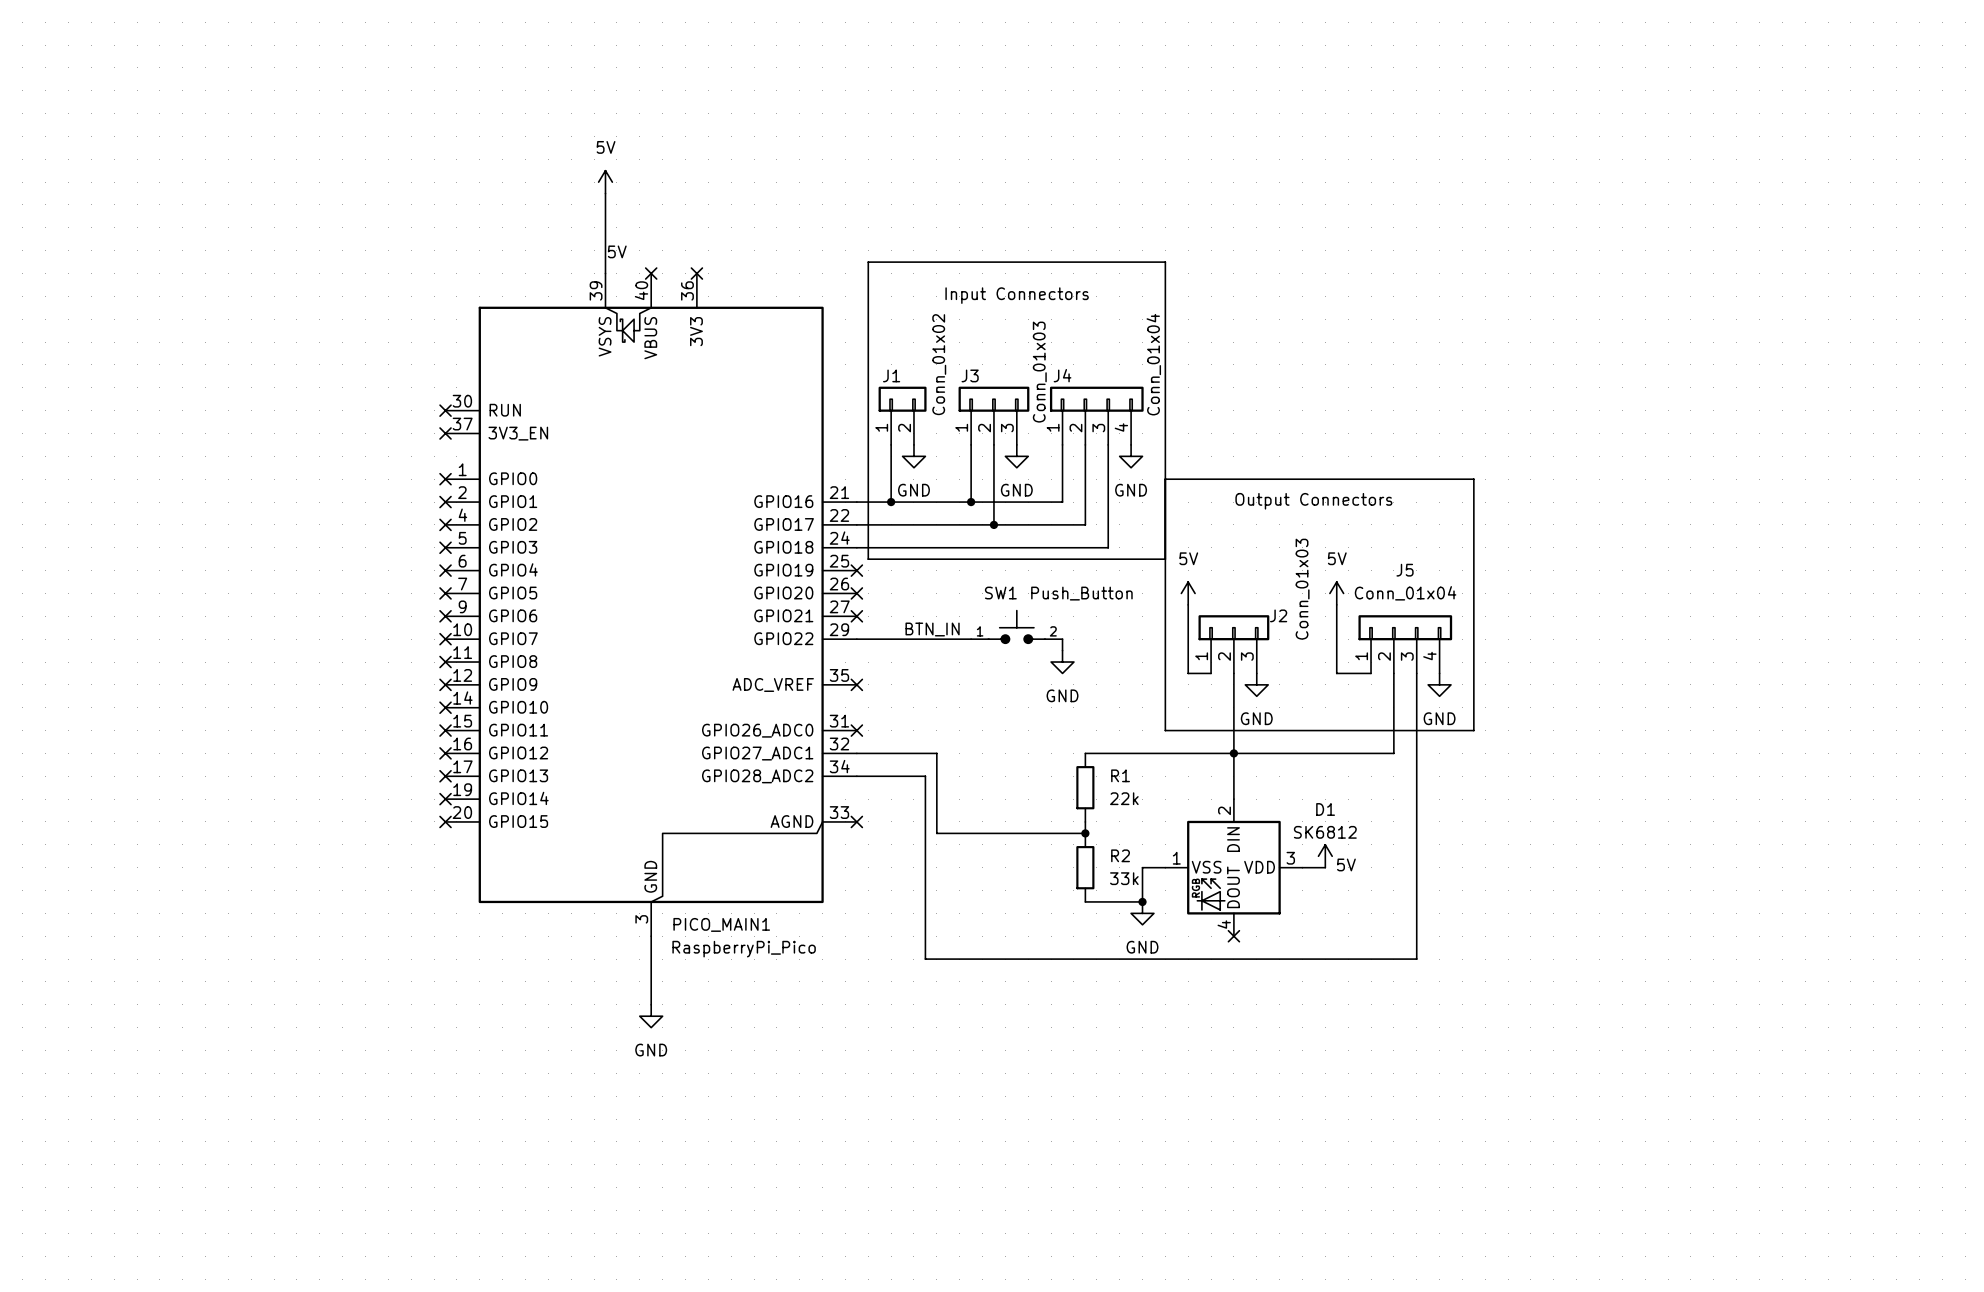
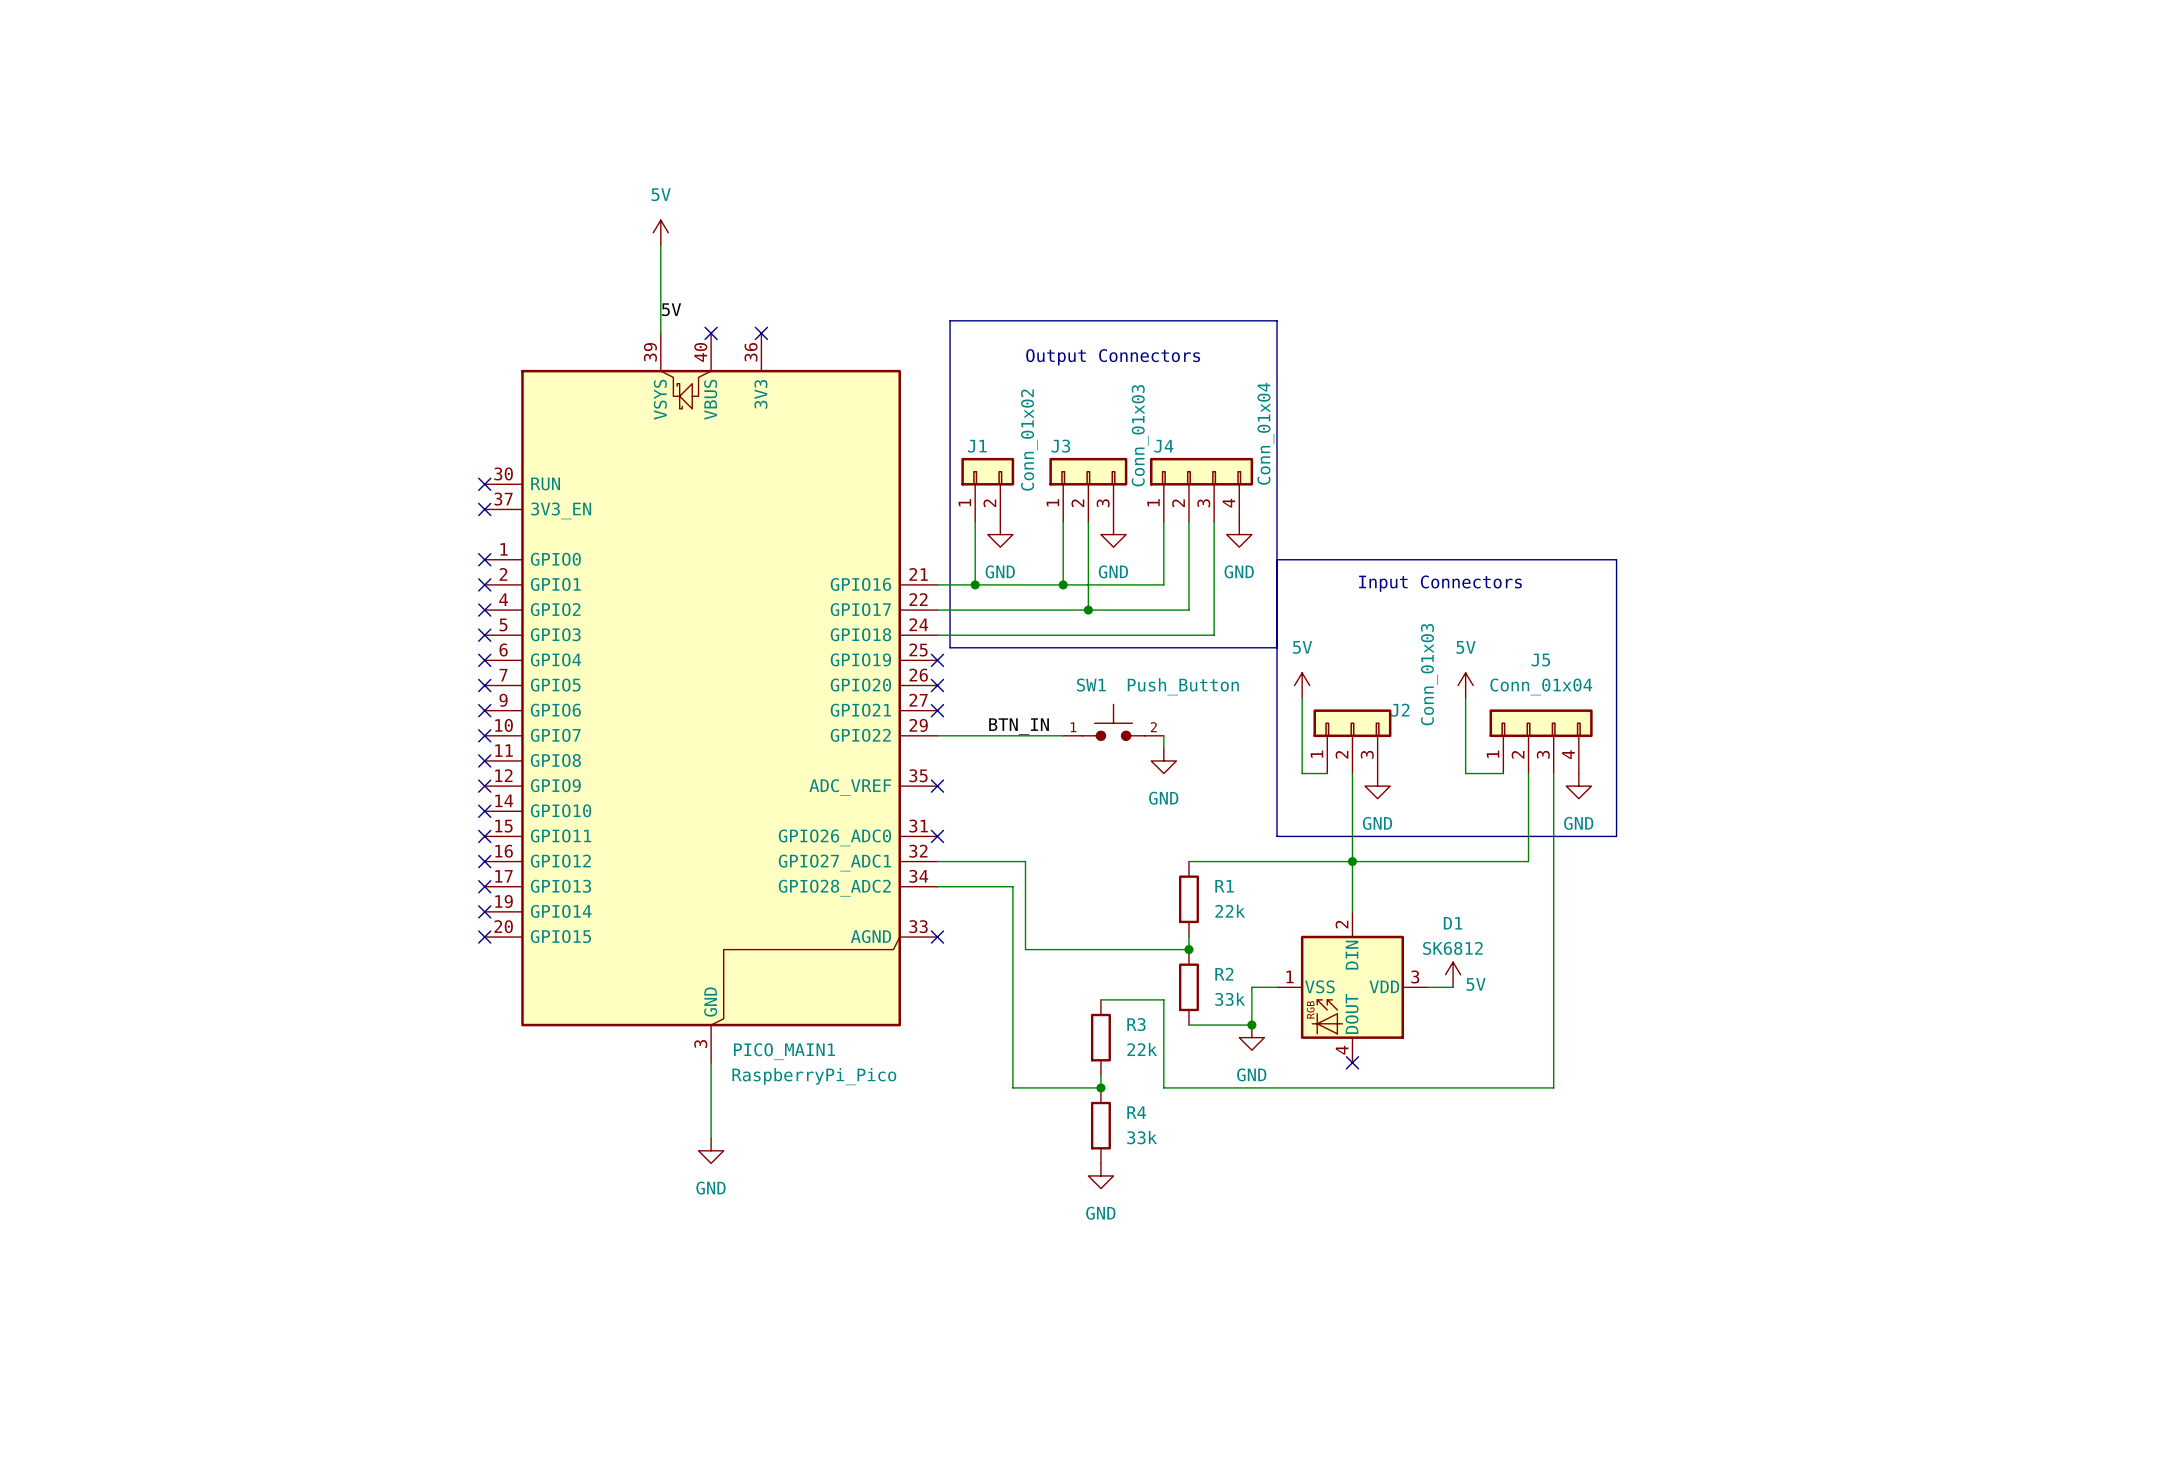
text: Input Connectors (1017, 295) -> Output Connectors (1113, 357)
text: Output Connectors (1313, 501) -> Input Connectors (1440, 583)
wire: none -> (1100, 999) (1163, 999) (1163, 1087)
R3: none -> 22k (1100, 1037)
wire: (1005, 959) (1062, 959) -> (1100, 1087) (1100, 1075)
junction: none -> (1100, 1087)
R4: none -> 33k (1100, 1125)
power symbol: none -> GND (1100, 1175)

